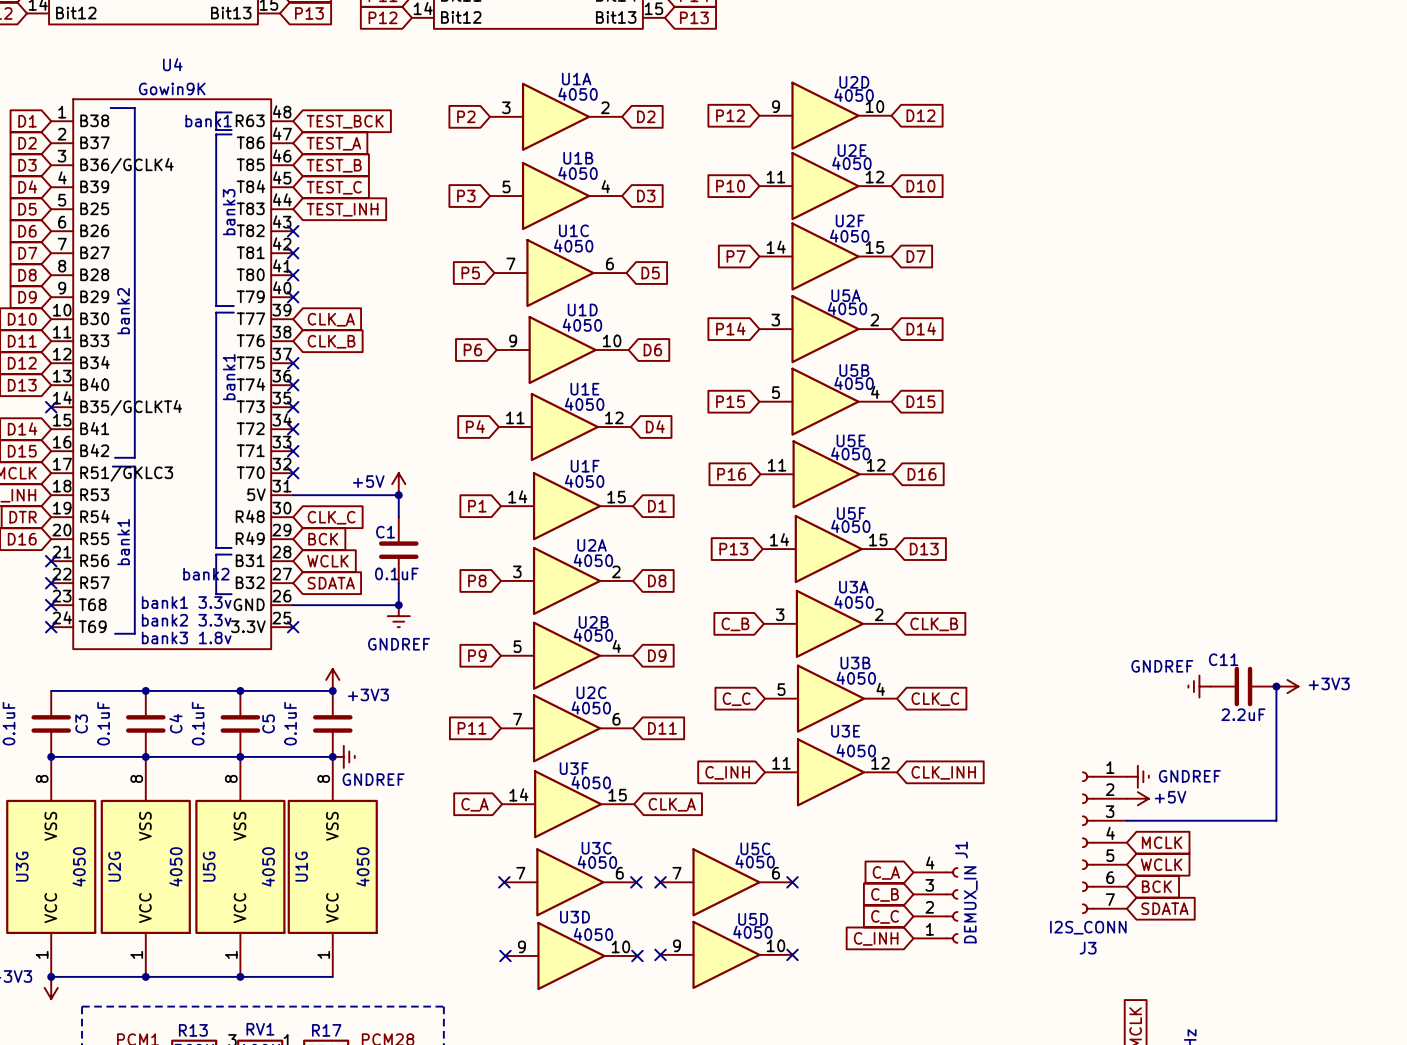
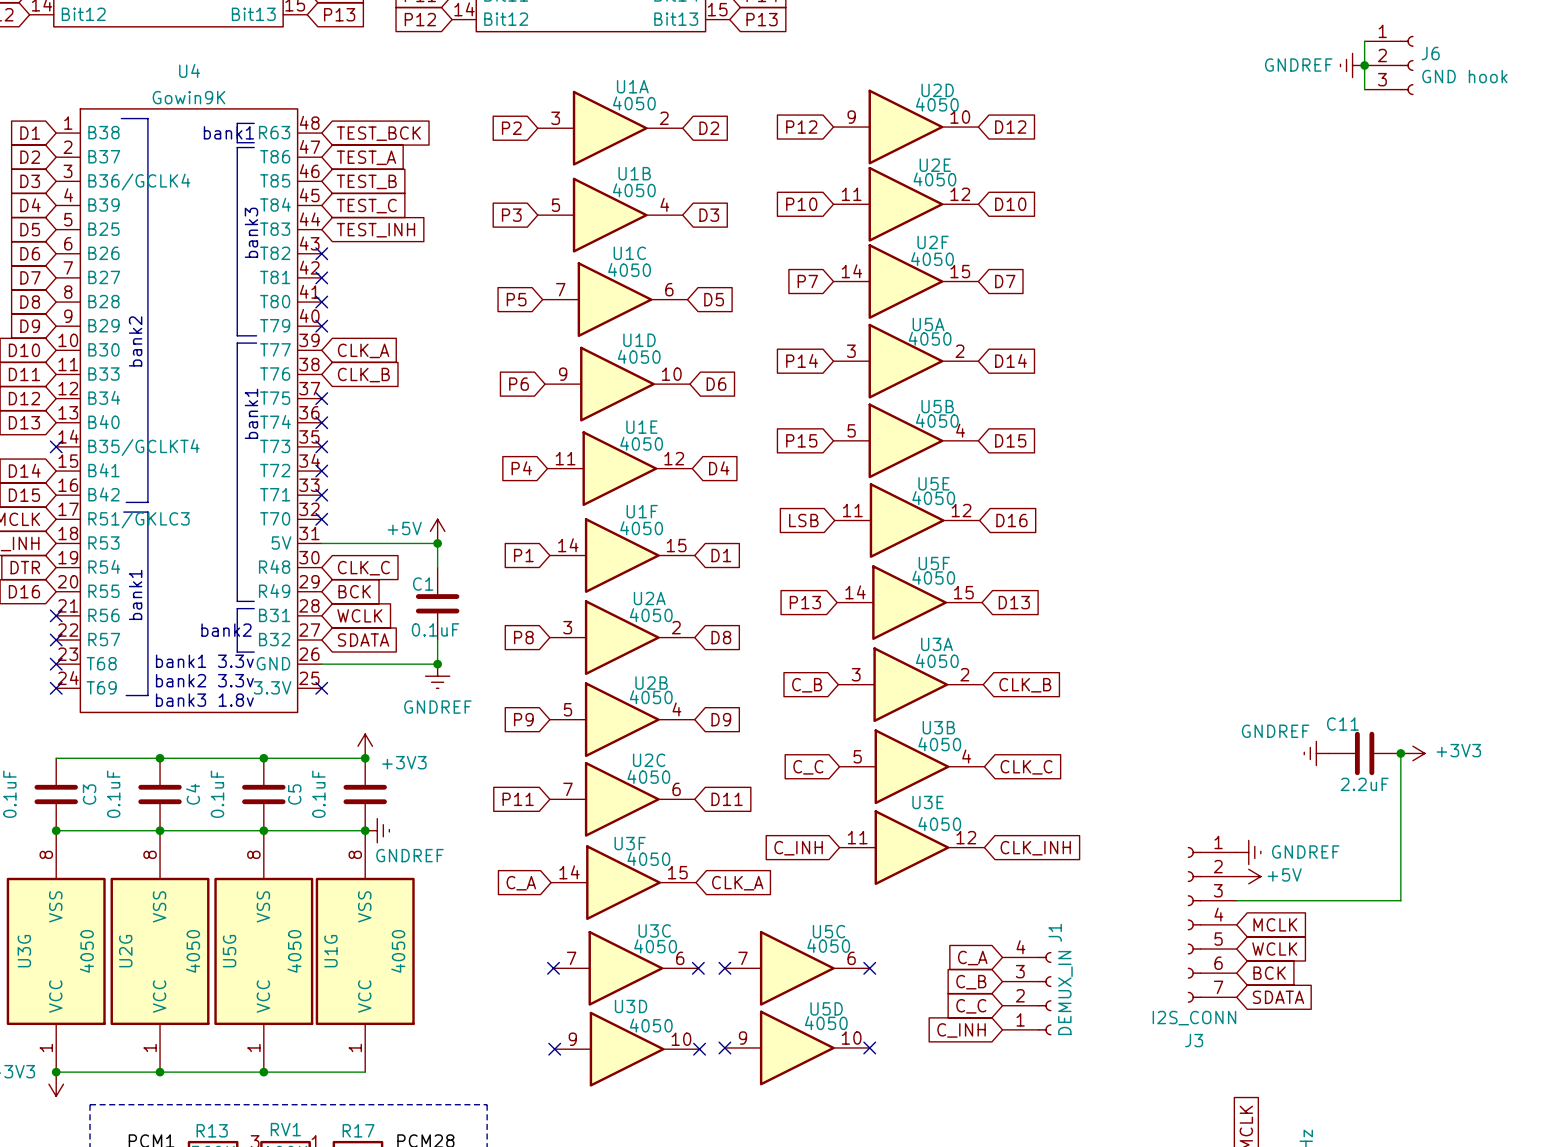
wire: none -> (1364, 41) (1364, 89)
power symbol: none -> GNDREF (1352, 65)
junction: none -> (1364, 65)
J6: none -> GND hook (1389, 65)
global label: P16 (731, 474) -> LSB (803, 520)

